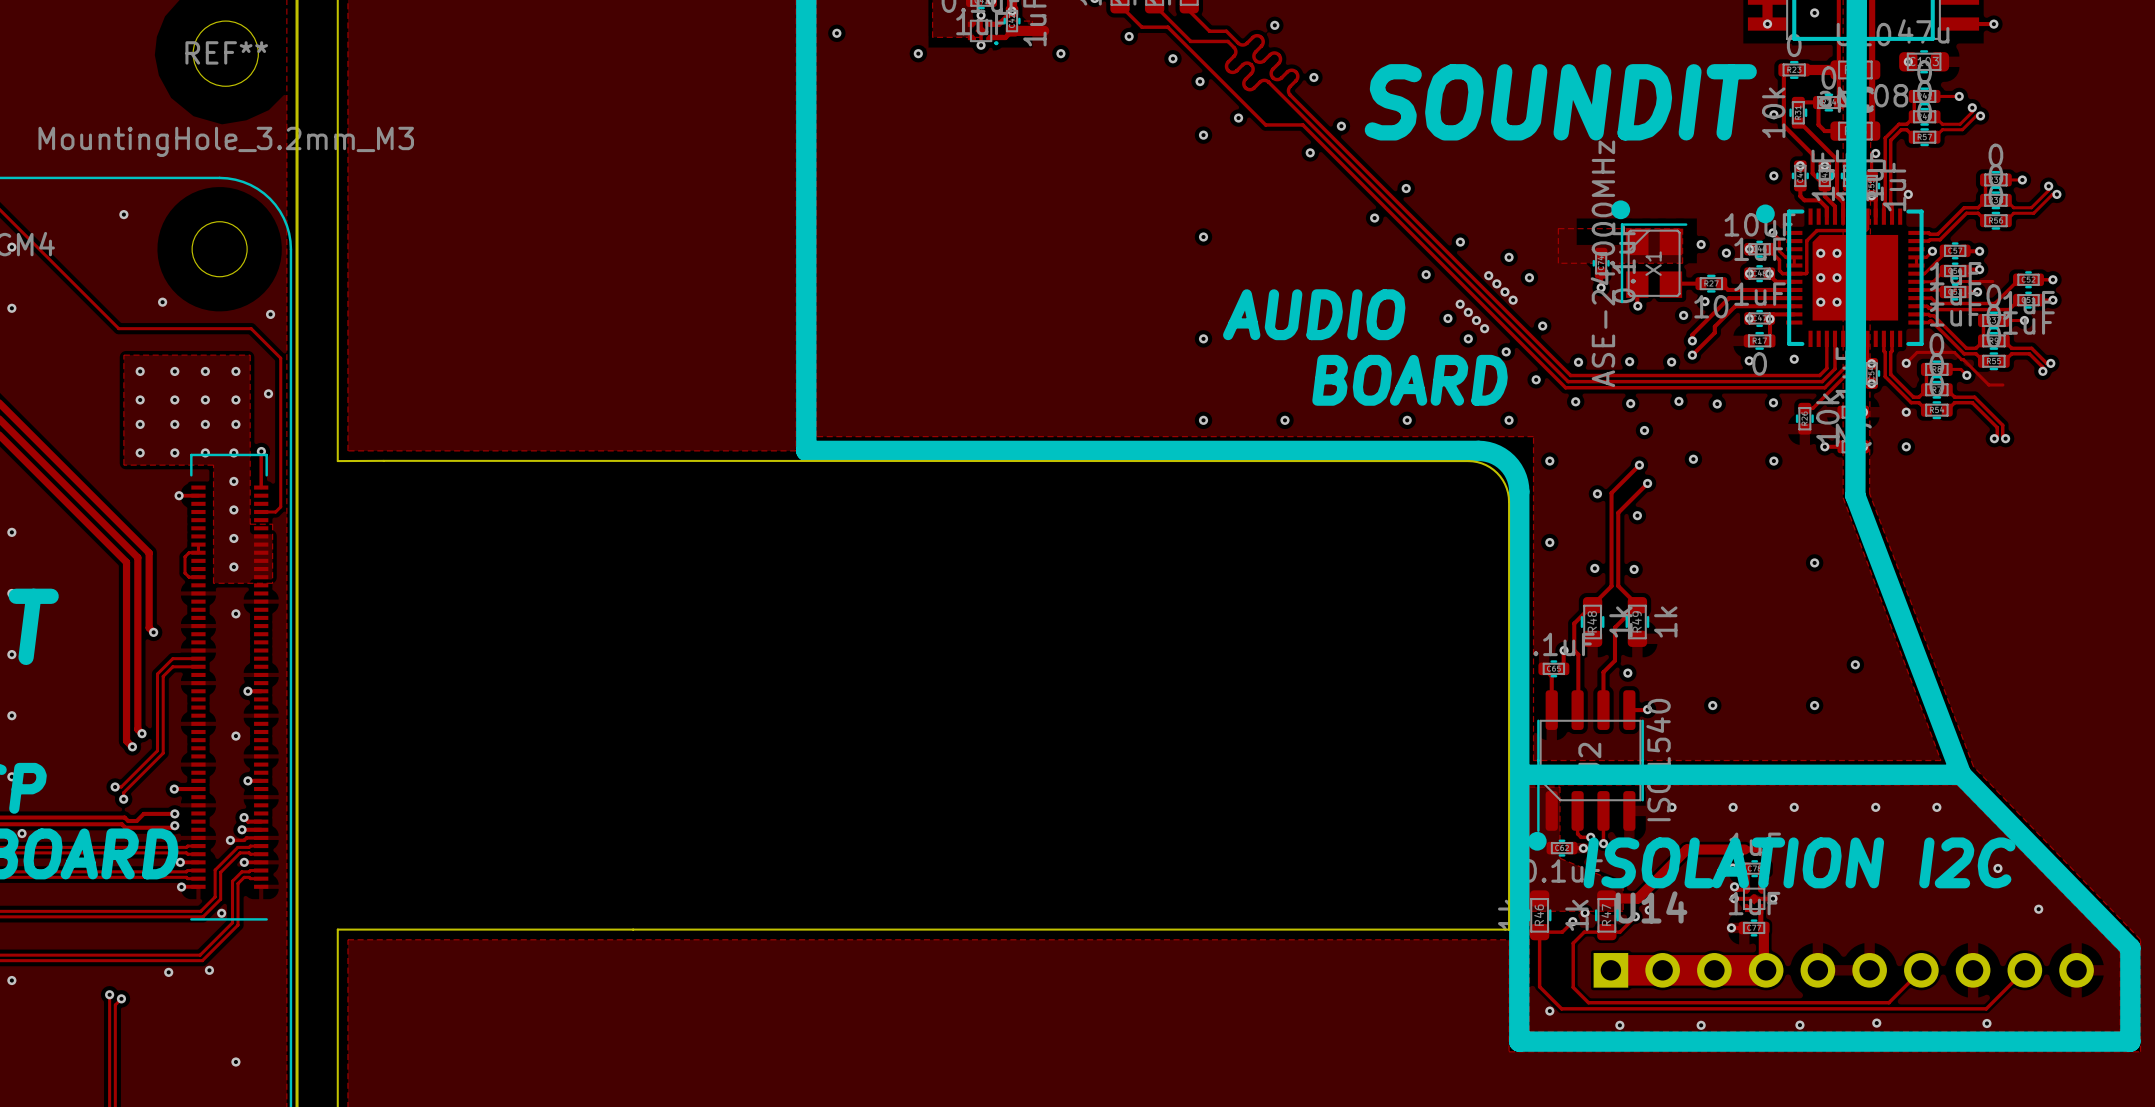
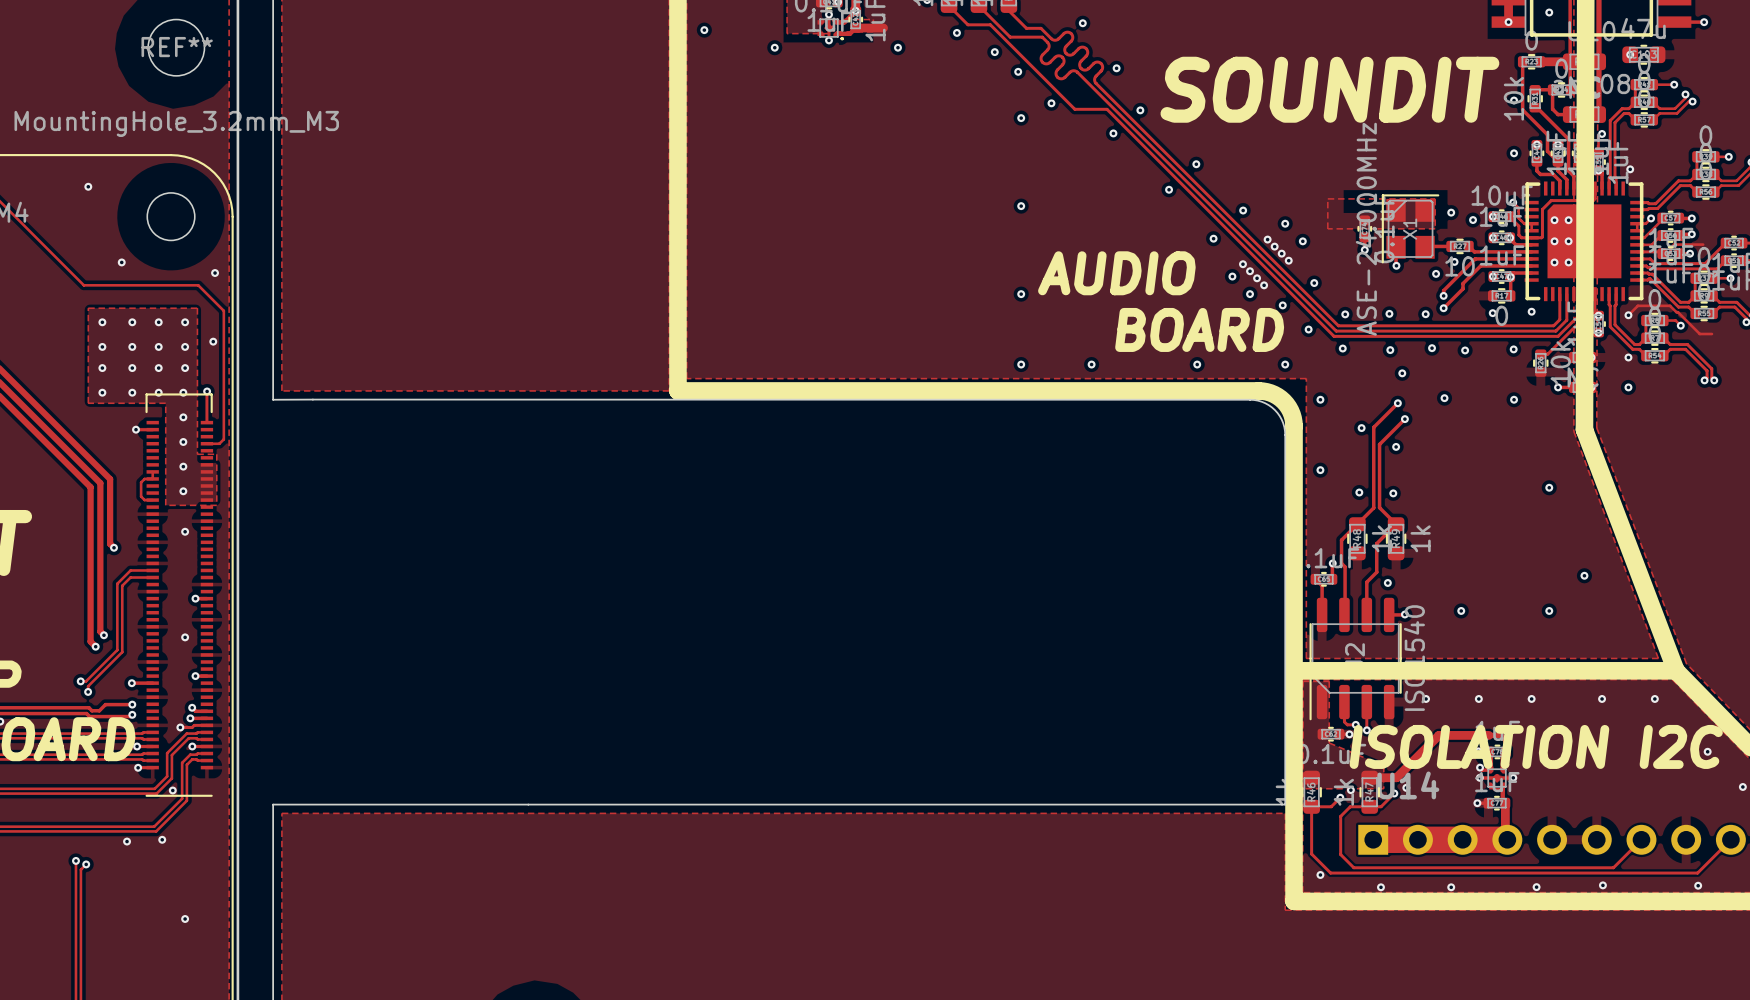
drawing: [1611, 200, 1631, 220] -> none
drawing: [1756, 204, 1775, 224] -> none
drawing: [1527, 831, 1547, 851] -> none

